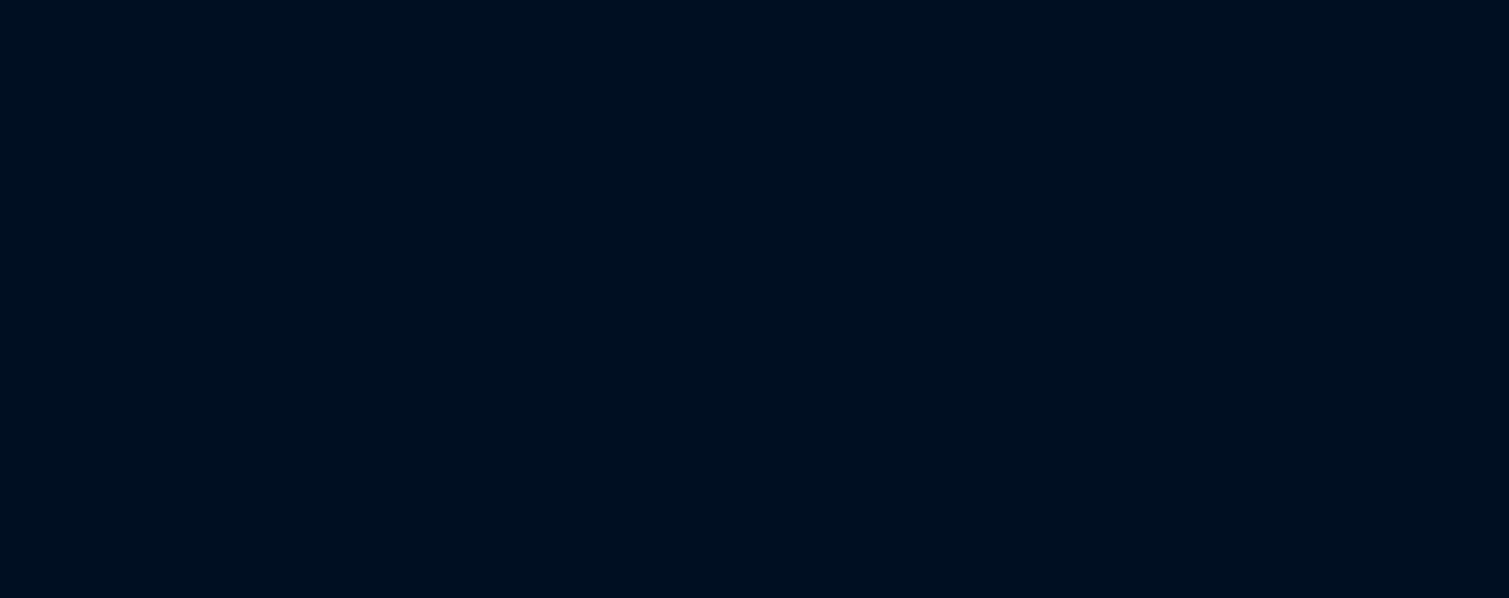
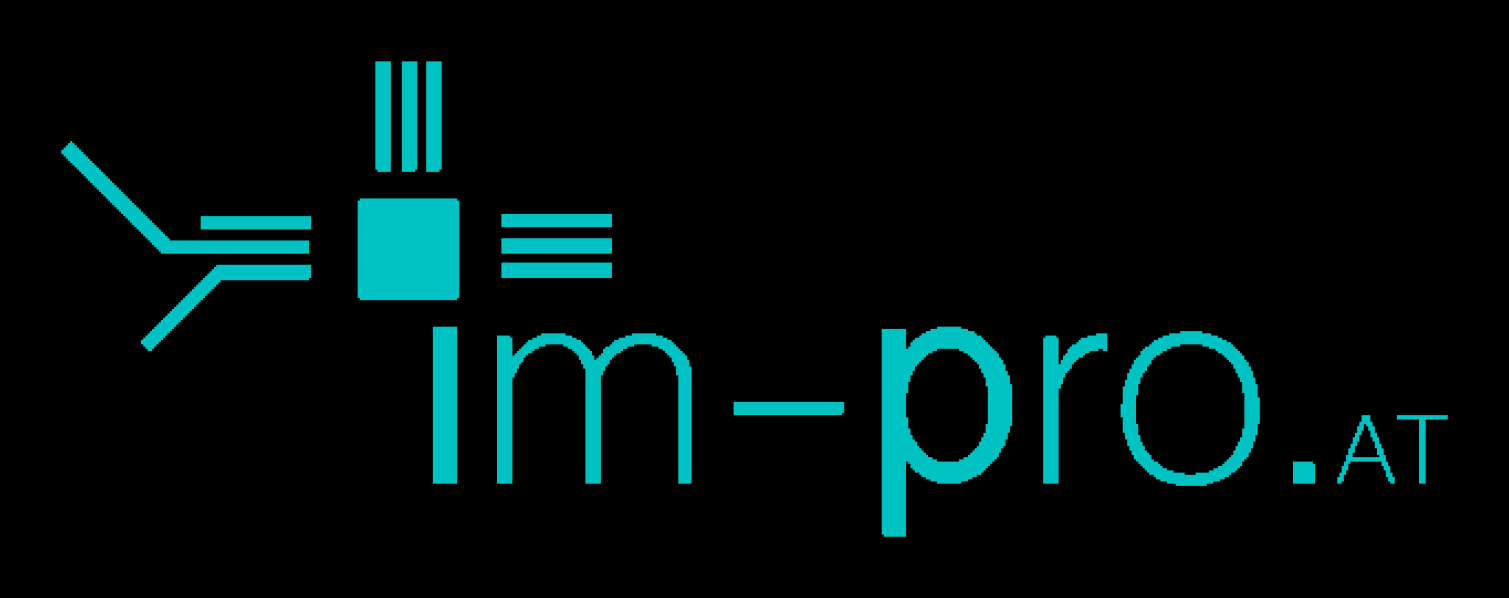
drawing: none -> [61, 61, 1448, 537]

